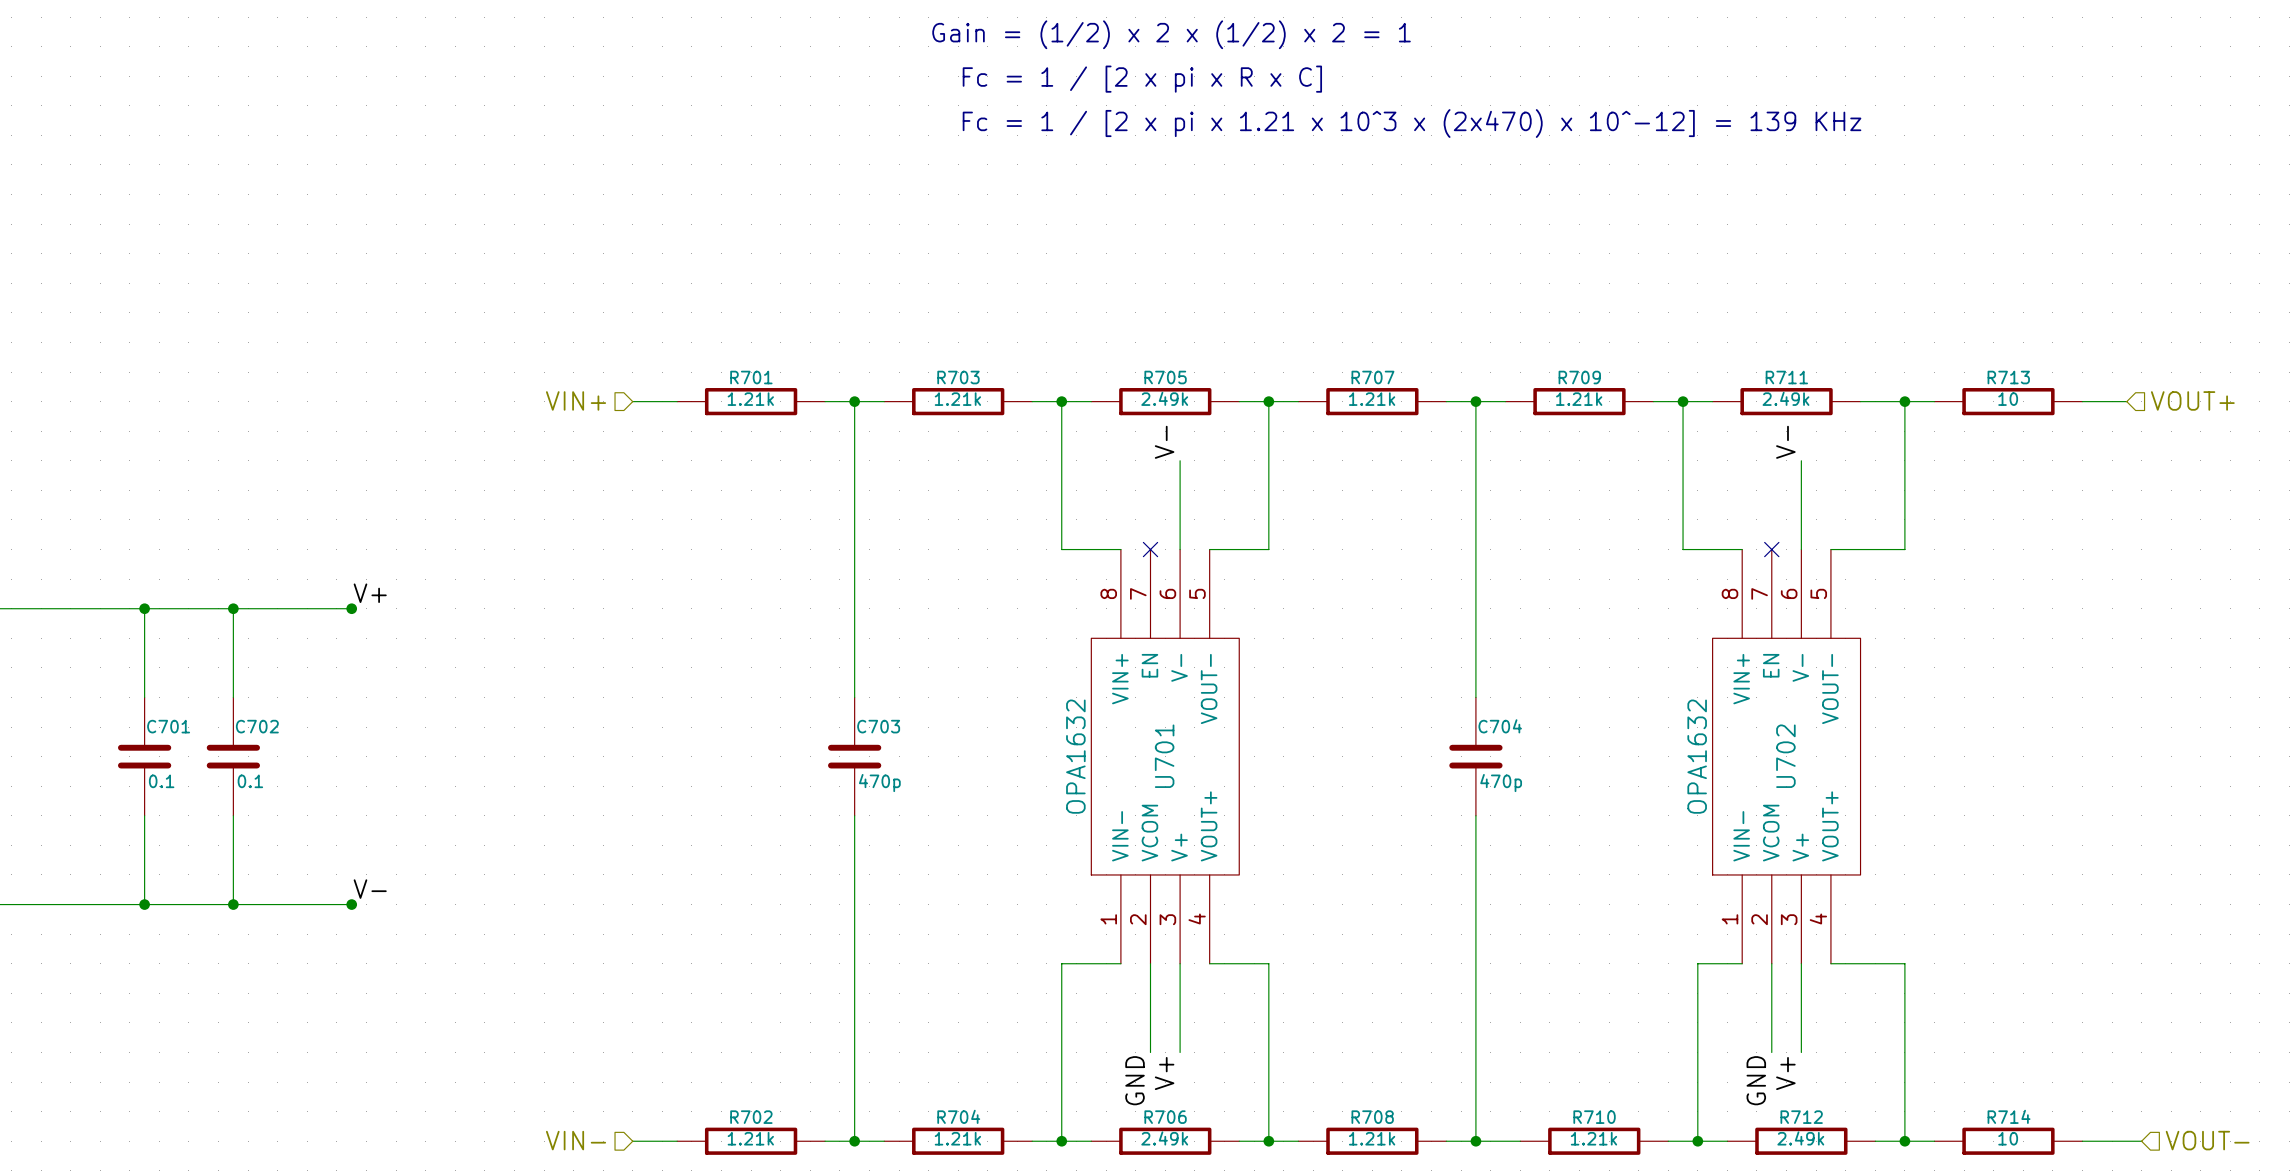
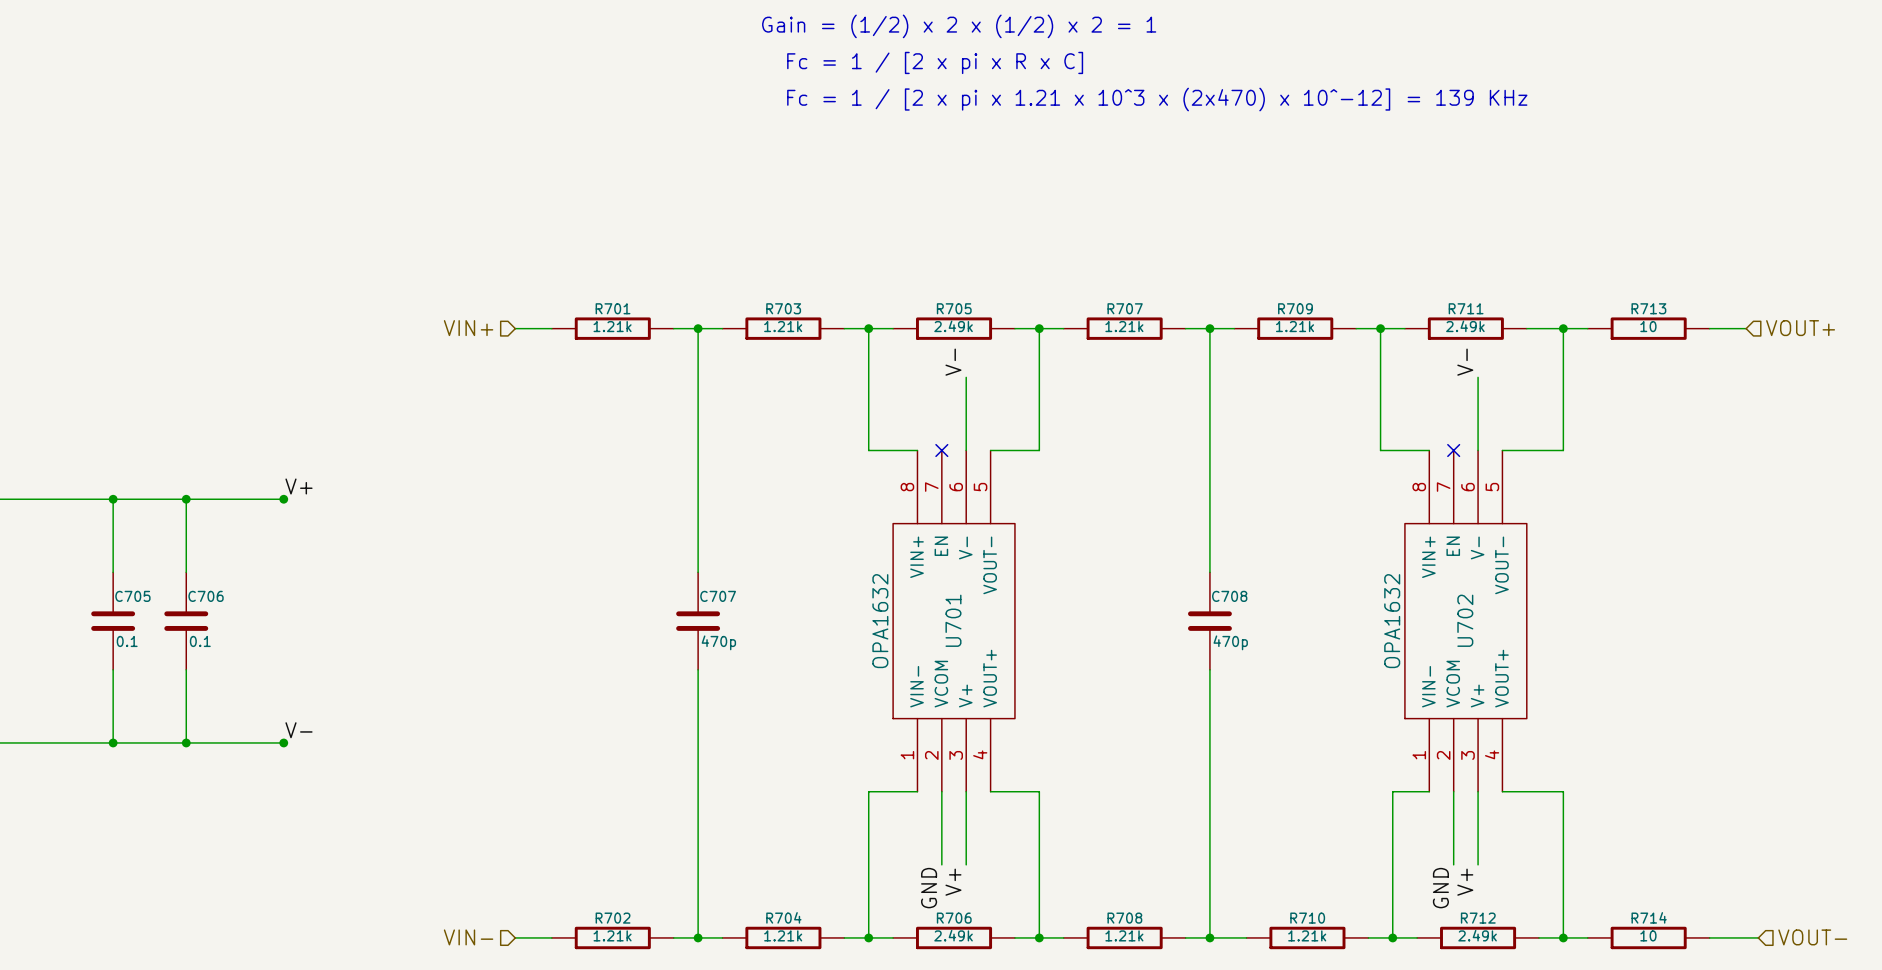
C701 name: C701 (168, 726) -> C705 (132, 596)
C702 name: C702 (257, 726) -> C706 (206, 596)
C703 name: C703 (878, 726) -> C707 (718, 596)
C704 name: C704 (1500, 726) -> C708 (1229, 596)

